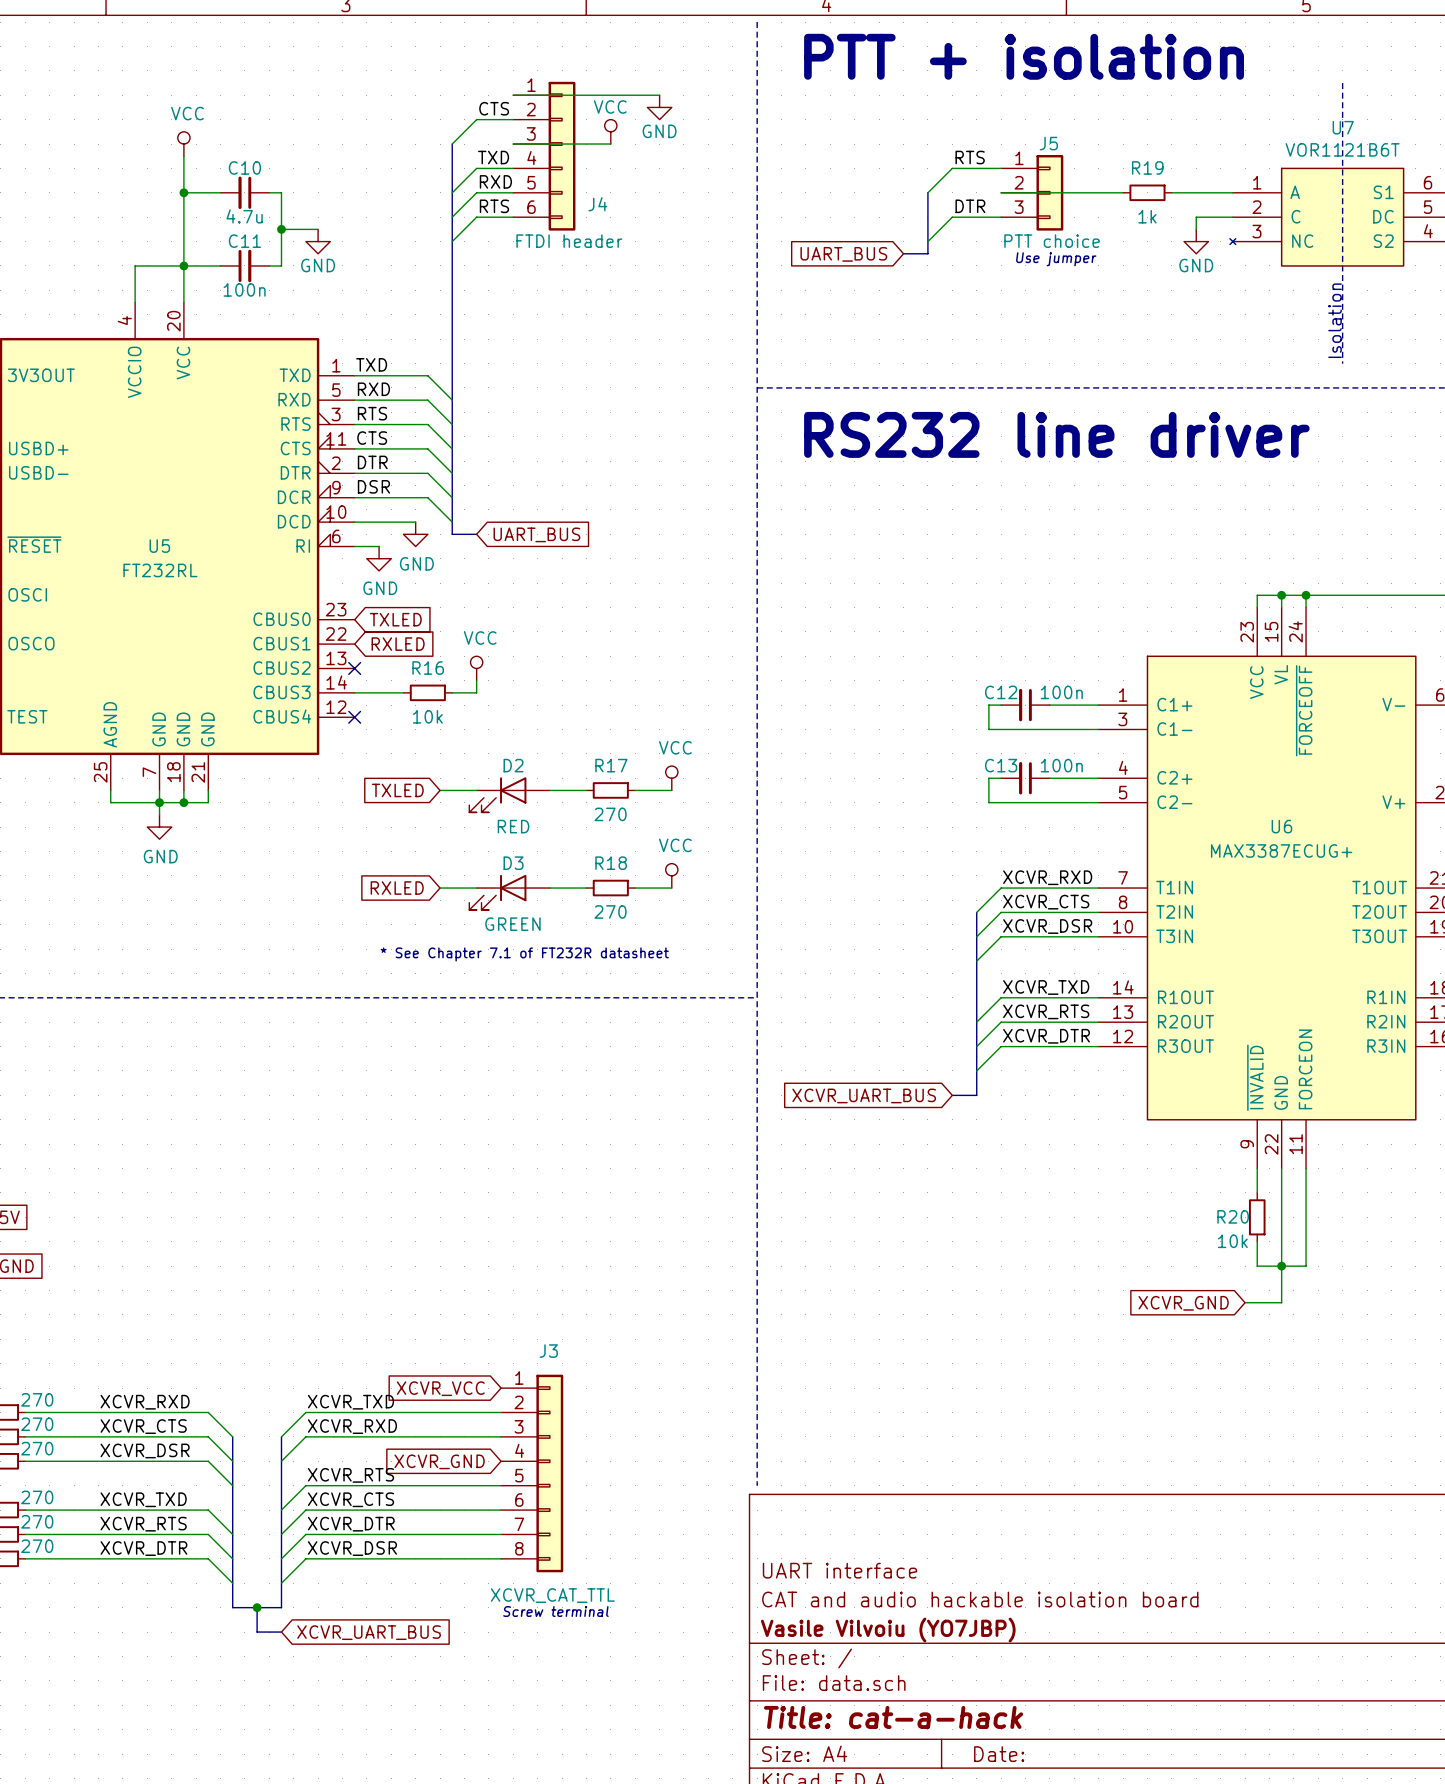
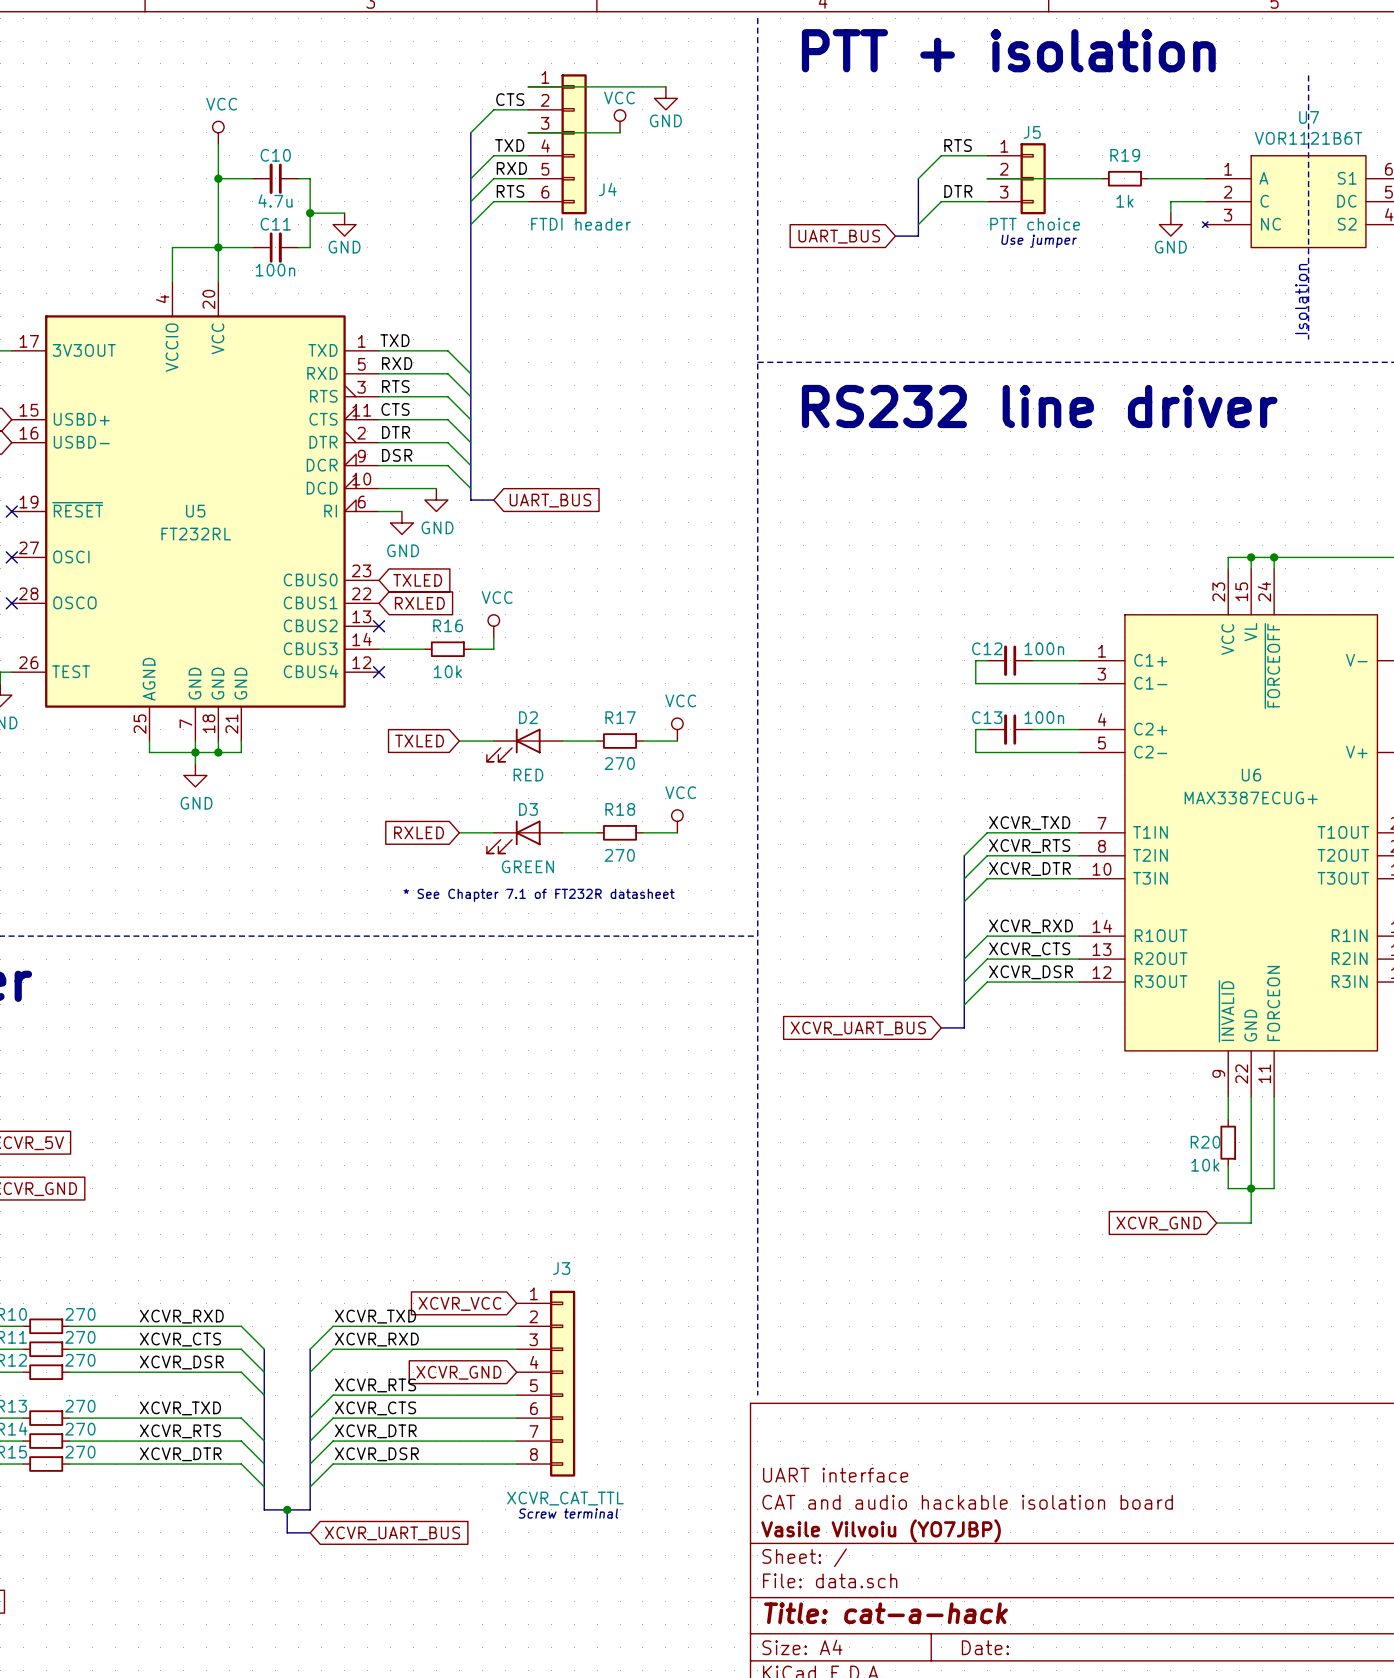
label: XCVR_RXD (1047, 877) -> XCVR_TXD (1029, 823)
label: XCVR_CTS (1046, 902) -> XCVR_RTS (1029, 846)
label: XCVR_DSR (1047, 926) -> XCVR_DTR (1029, 869)
label: XCVR_TXD (1046, 987) -> XCVR_RXD (1031, 926)
label: XCVR_RTS (1046, 1011) -> XCVR_CTS (1029, 949)
label: XCVR_DTR (1046, 1036) -> XCVR_DSR (1031, 972)

